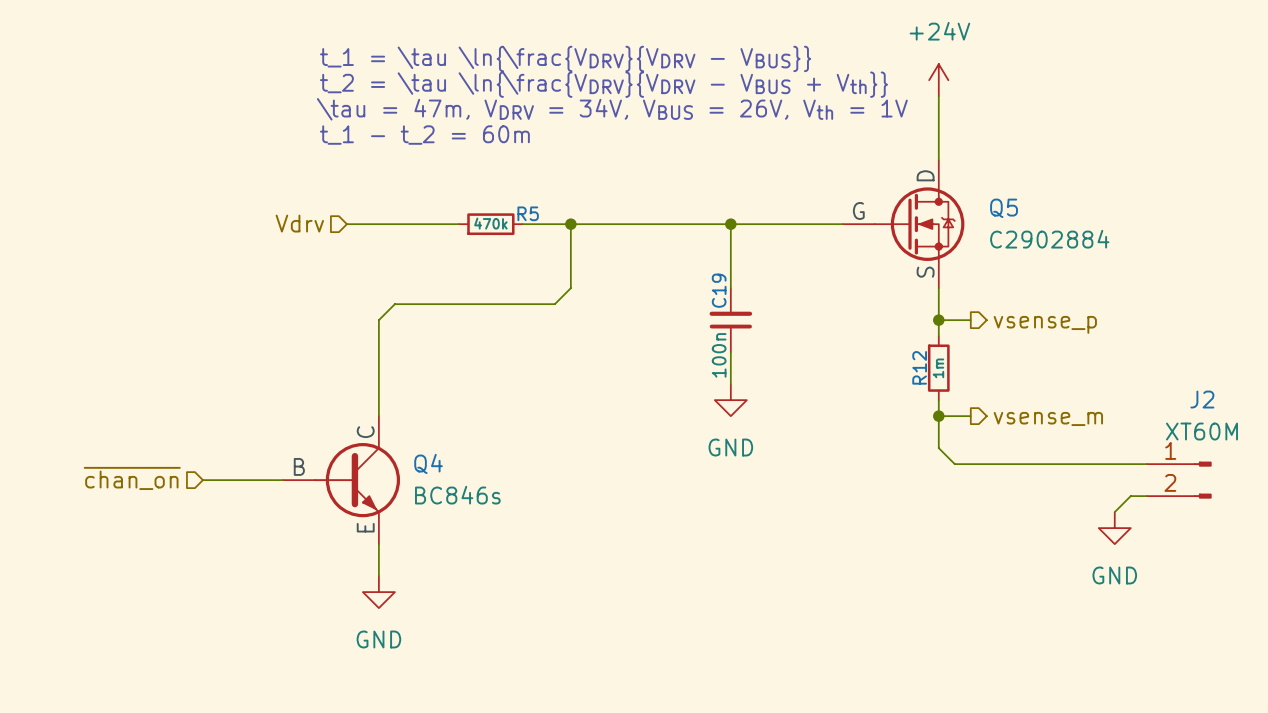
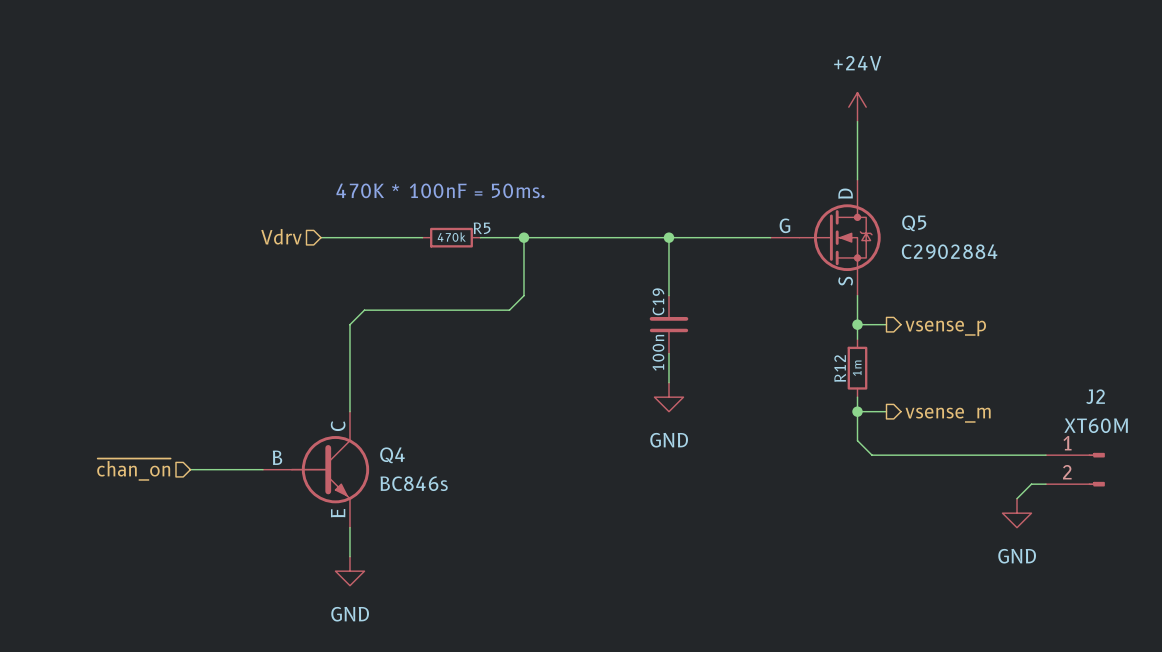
text: t_1 = \tau \ln{\frac{VDRV}{VDRV - VBUS}} (565, 58) -> none
text: t_2 = \tau \ln{\frac{VDRV}{VDRV - VBUS + Vth}} (603, 84) -> none
text: \tau = 47m, VDRV = 34V, VBUS = 26V, Vth = 1V (612, 109) -> none
text: t_1 - t_2 = 60m (424, 135) -> none
text: none -> 470K * 100nF = 50ms. (440, 190)

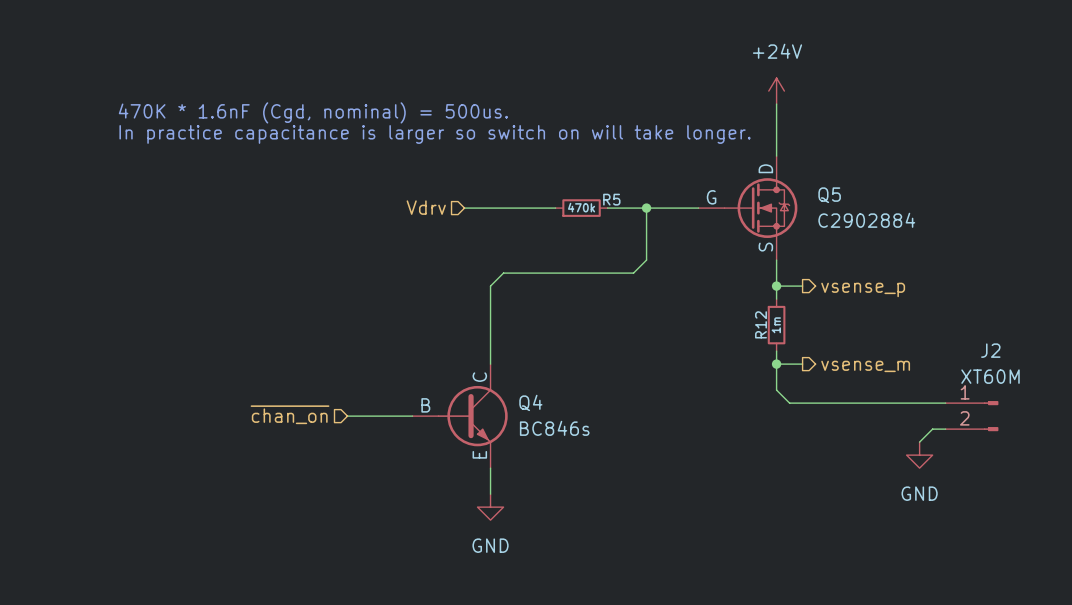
text: none -> 470K * 1.6nF (Cgd, nominal) = 500us. (313, 112)
text: none -> In practice capacitance is larger so switch on will take longer. (435, 134)
text: 470K * 100nF = 50ms. (440, 190) -> none
hierarchical label position: Vdrv (281, 236) -> Vdrv (426, 207)
wire: (320, 237) (422, 237) -> none
R5 position: (451, 237) -> (581, 208)
wire: (480, 237) (509, 237) -> none
wire: (523, 237) (523, 295) (509, 310) (364, 310) (349, 324) (349, 411) -> (646, 208) (646, 260) (633, 273) (503, 273) (490, 286) (490, 364)
junction: (523, 237) -> none
wire: (610, 237) (668, 237) (668, 295) -> none
junction position: (668, 237) -> (646, 208)
C19: 100n (668, 324) -> none
wire: (668, 353) (668, 382) -> none
power symbol: GND (668, 397) -> none
hierarchical label position: ~{chan_on} (133, 469) -> ~{chan_on} (290, 414)
wire: (190, 469) (262, 469) -> (347, 416) (412, 416)
Q4 position: (316, 469) -> (460, 416)
wire: (349, 527) (349, 556) -> (490, 468) (490, 494)
power symbol: GND (349, 571) -> none
power symbol: none -> GND (490, 507)

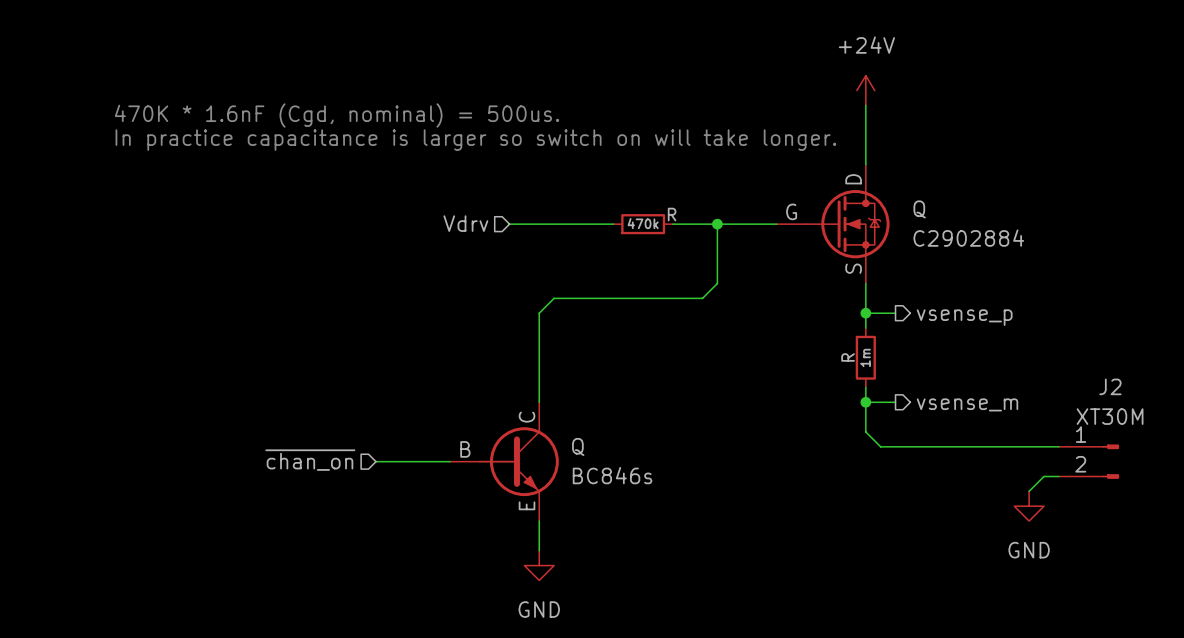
Q5 name: Q5 (829, 195) -> Q (919, 209)
R5 name: R5 (611, 199) -> R (672, 214)
R12 name: R12 (761, 324) -> R (848, 357)
J2 value: XT60M (990, 376) -> XT30M (1110, 416)
Q4 name: Q4 (530, 402) -> Q (578, 446)

